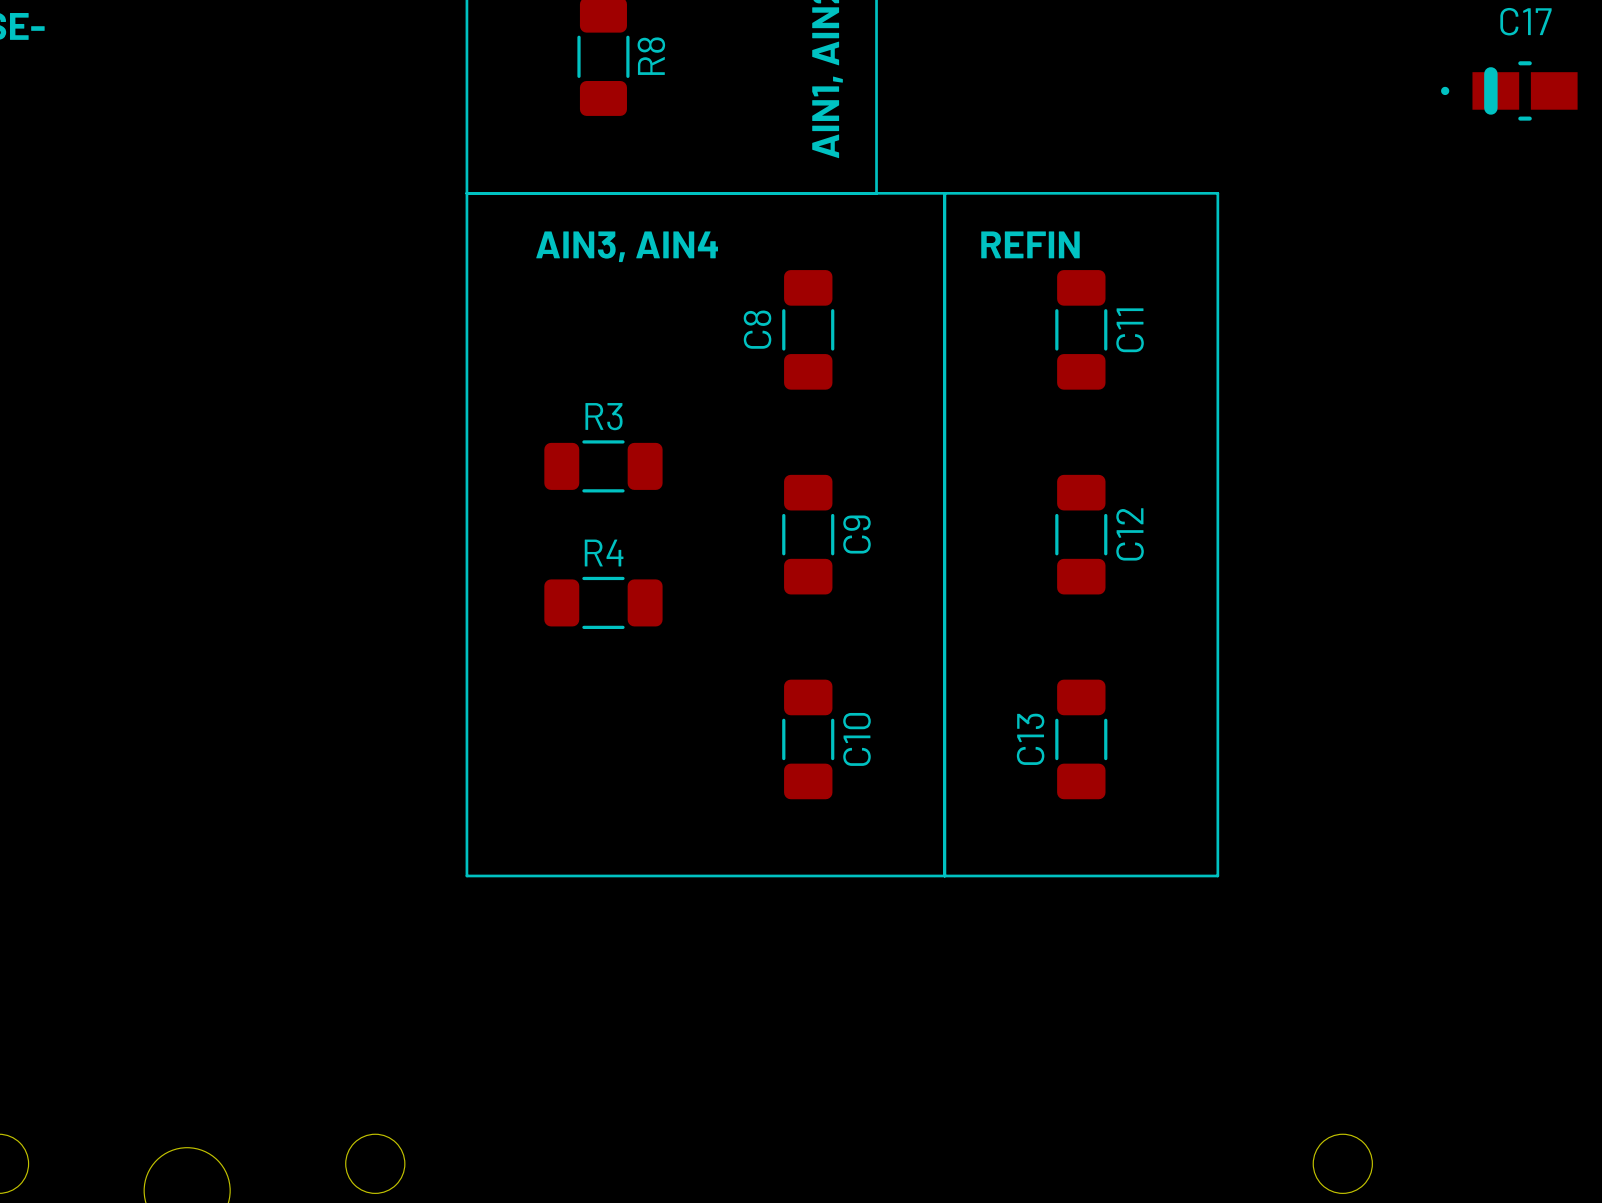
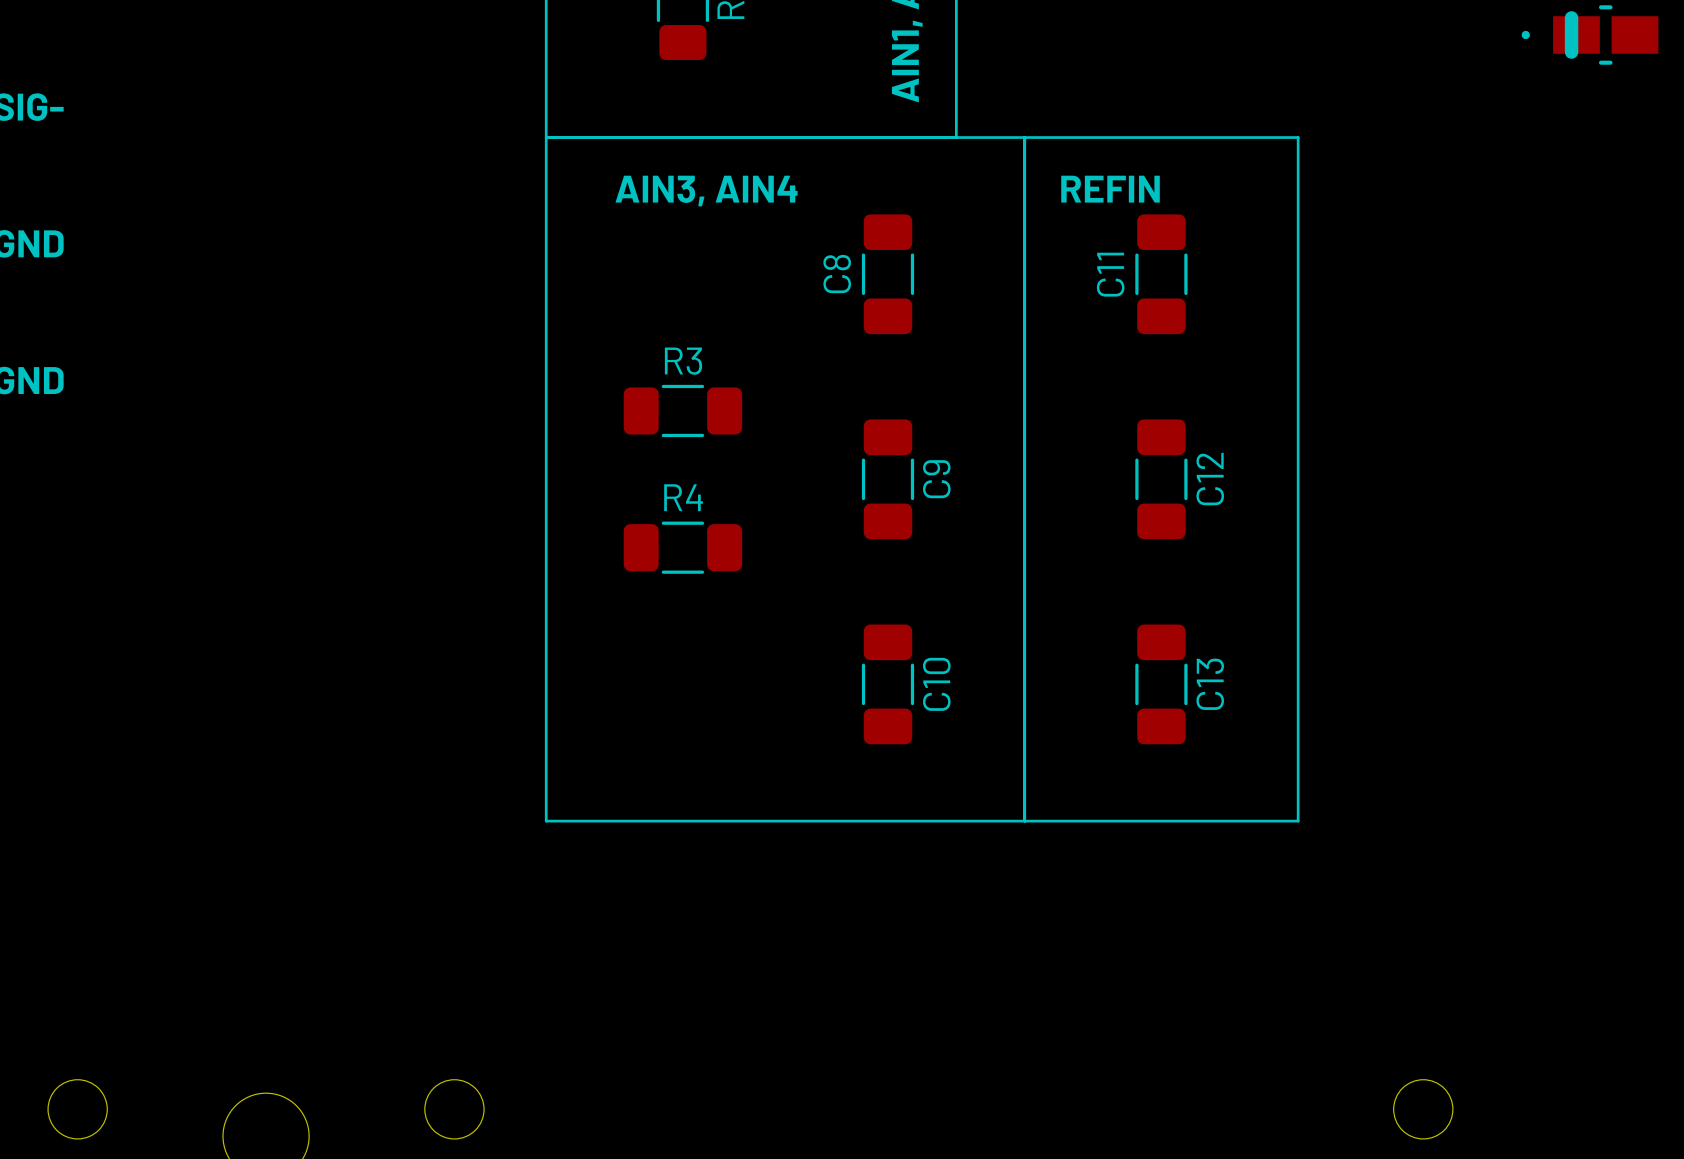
C11 name position: C11 (1130, 330) -> C11 (1110, 274)
C13 name position: C13 (1030, 739) -> C13 (1210, 684)

